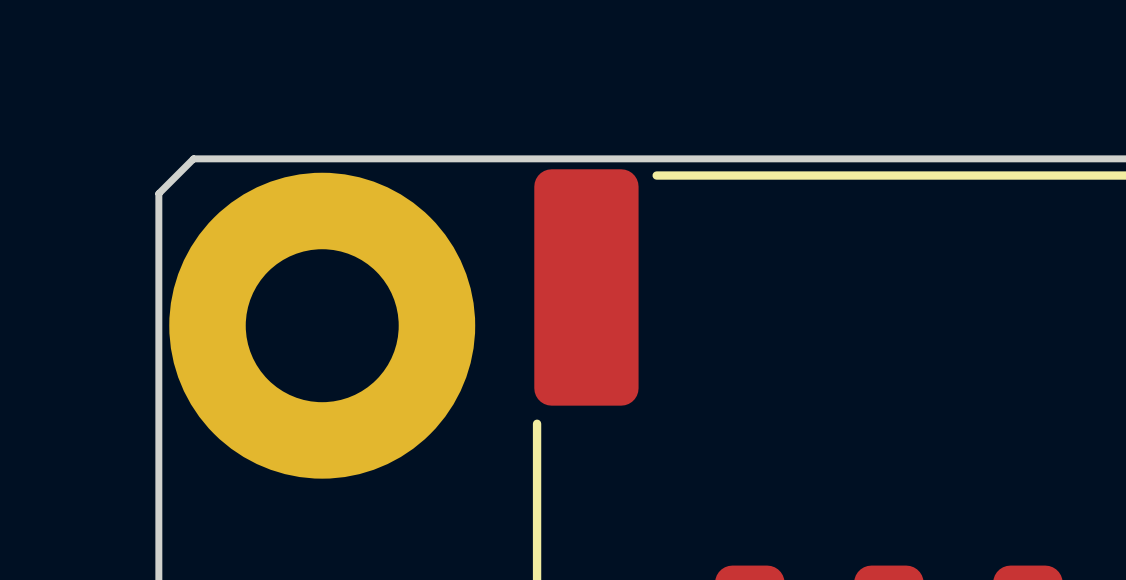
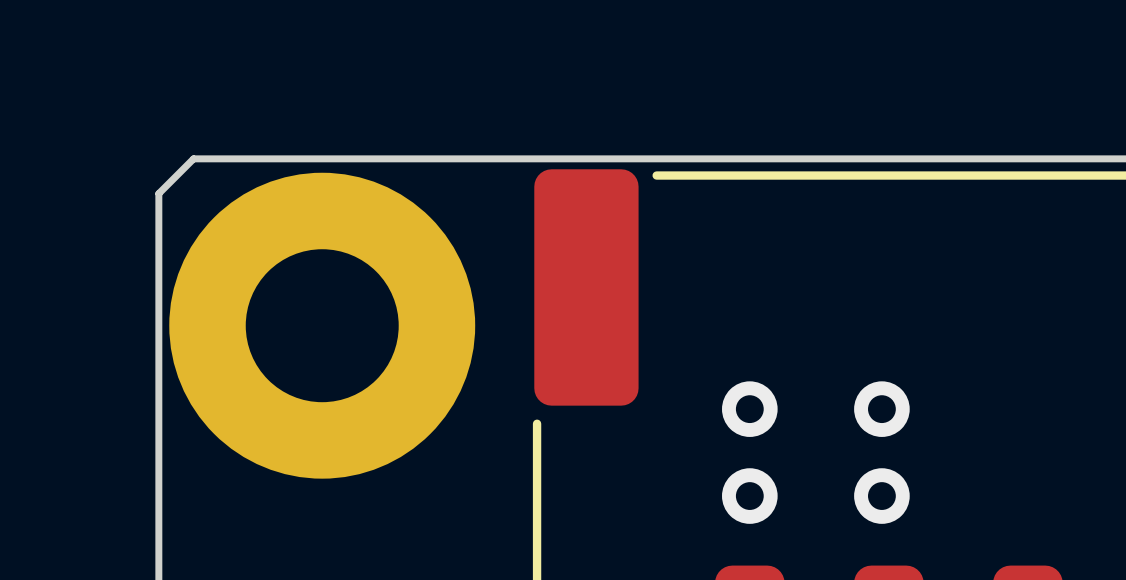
via: none -> (749, 409)
via: none -> (881, 409)
via: none -> (749, 496)
via: none -> (881, 496)

